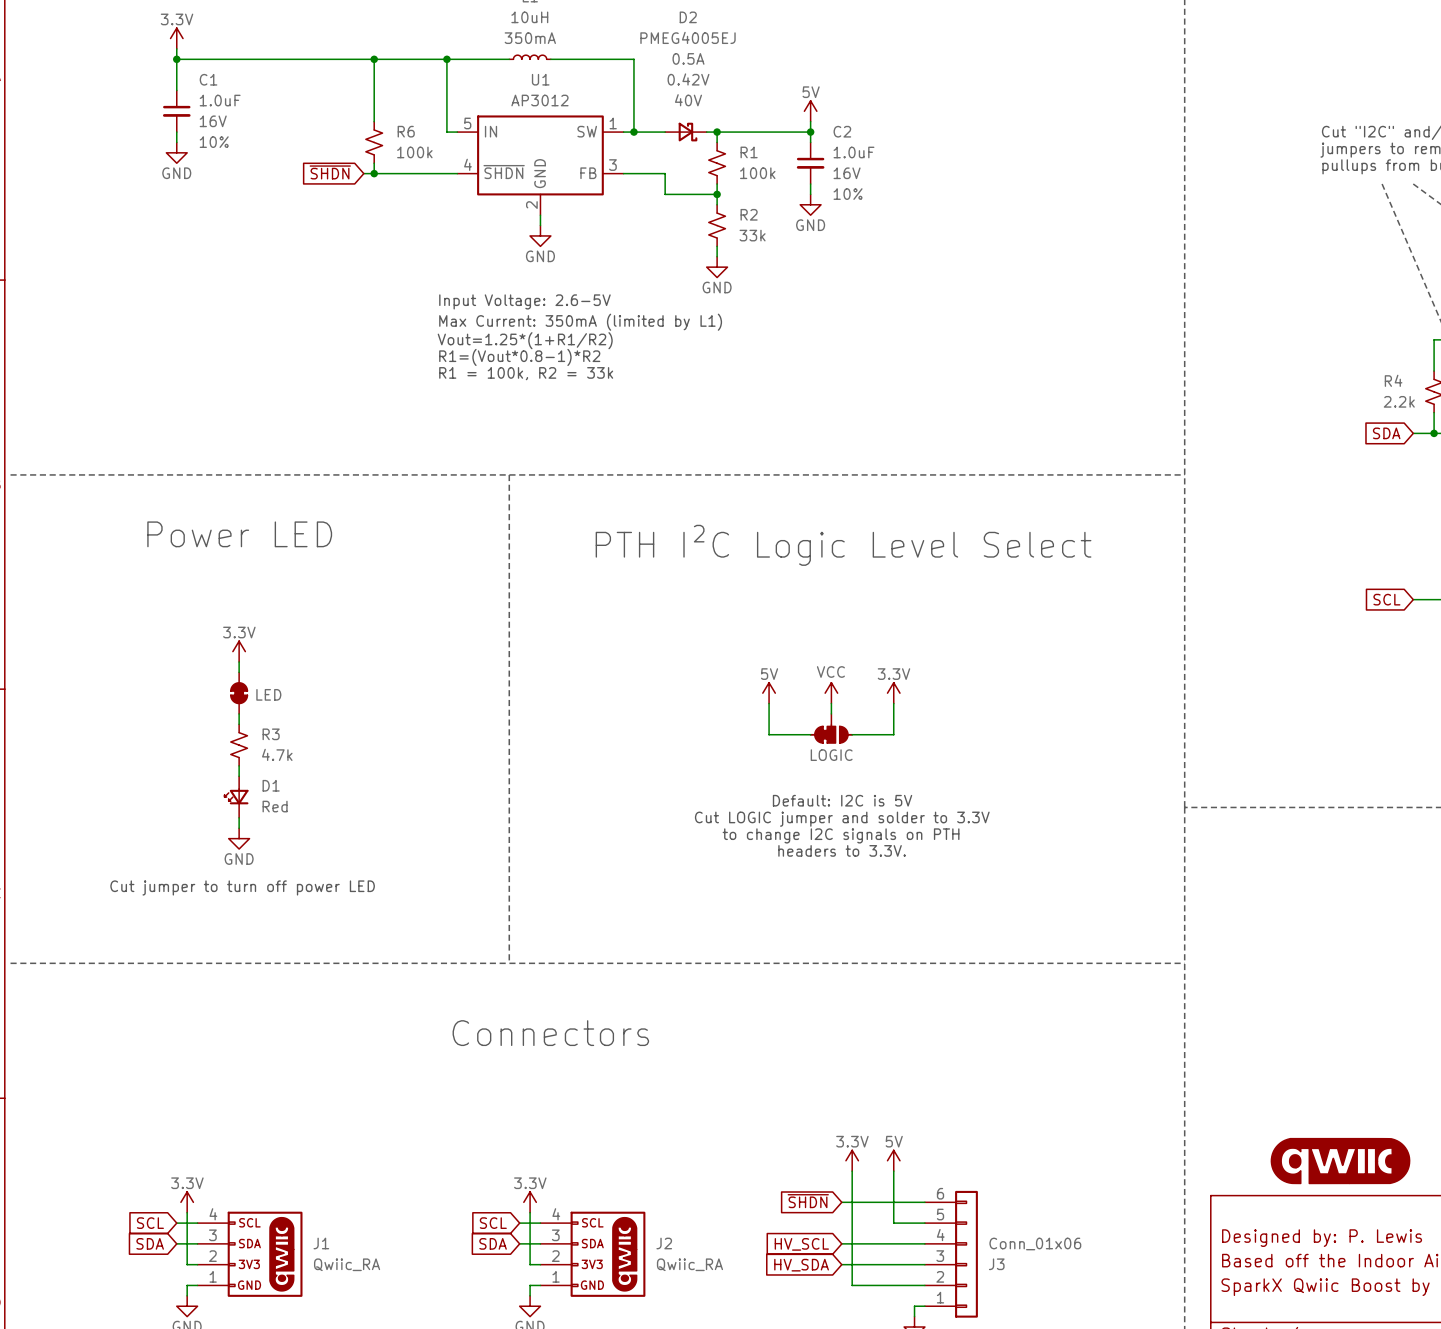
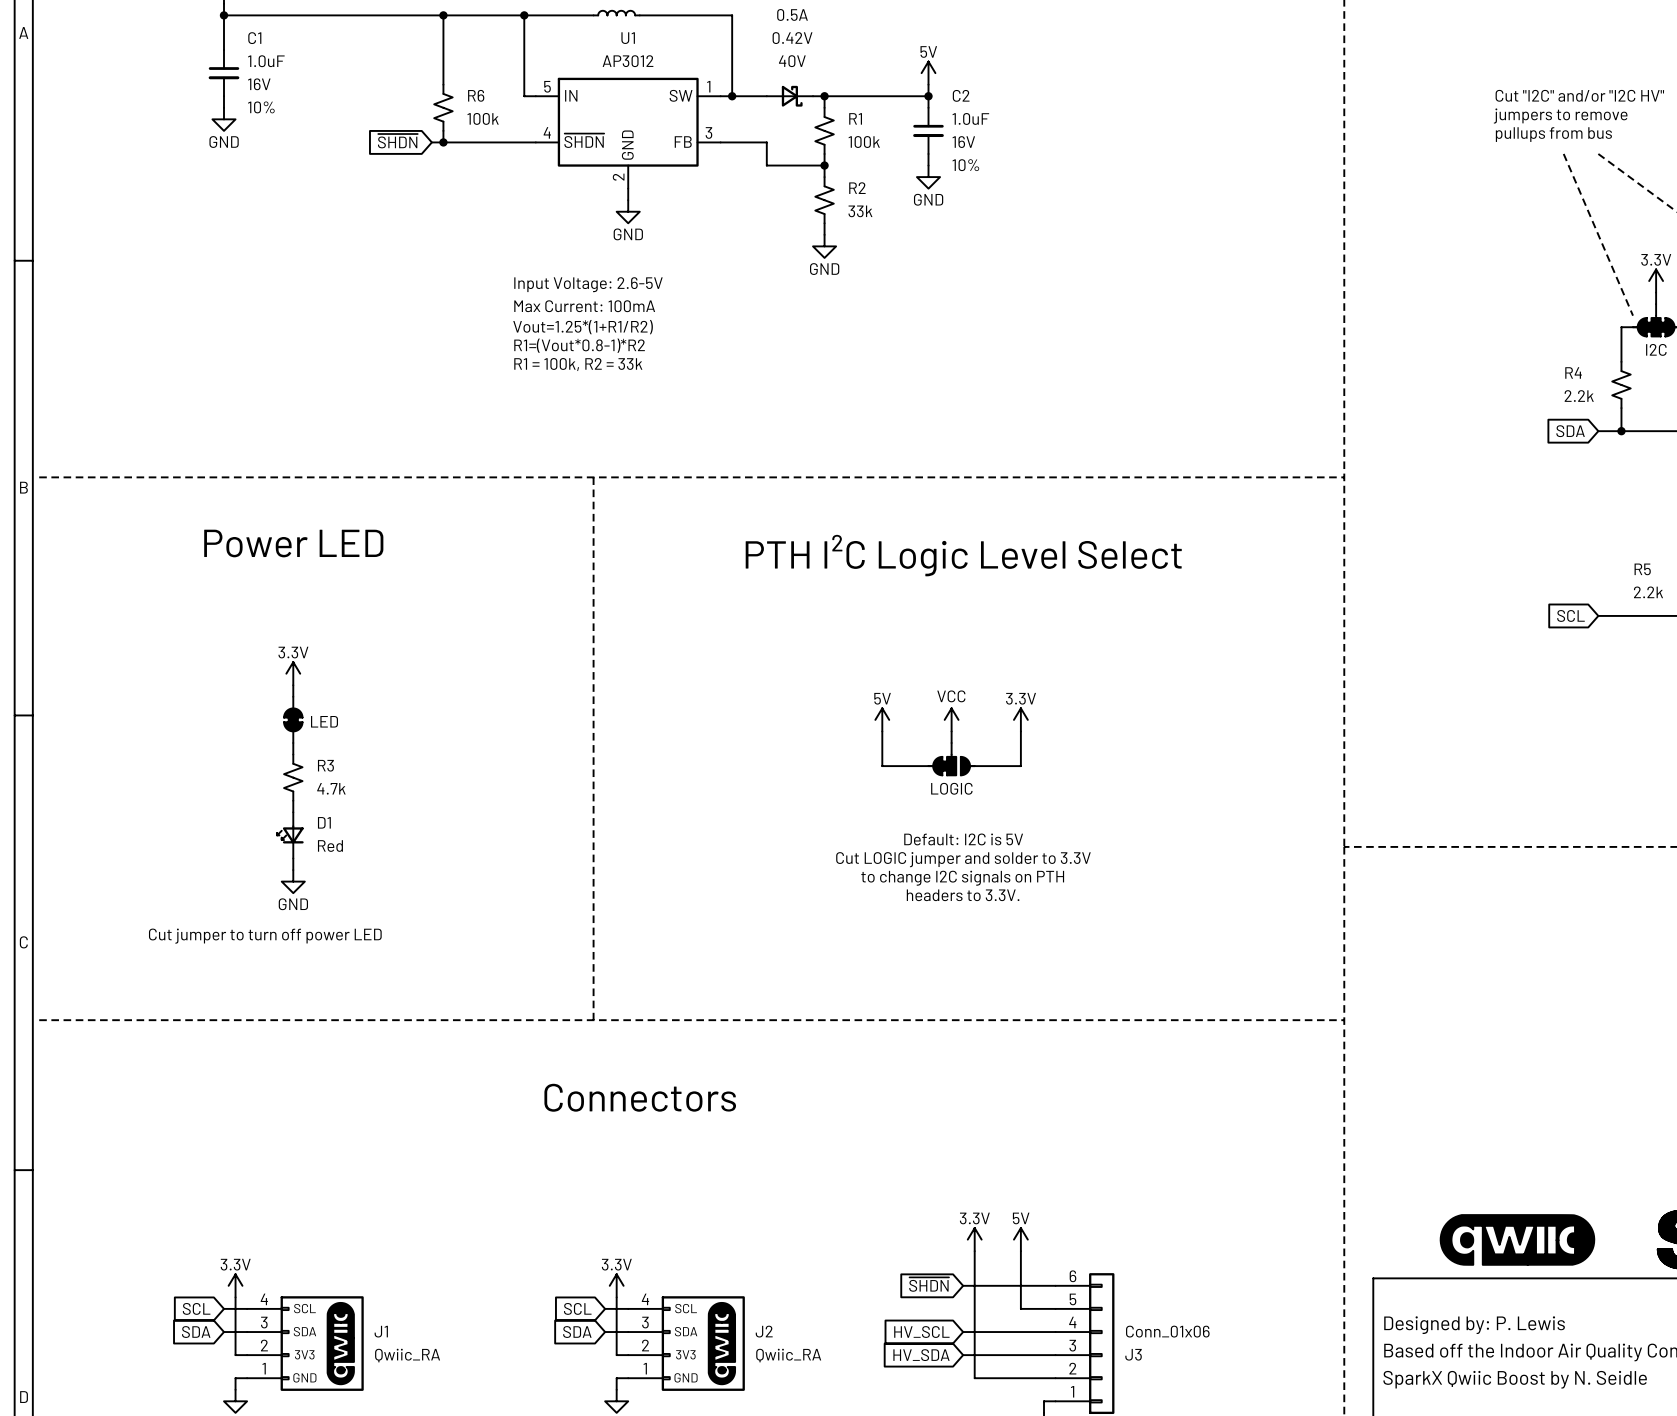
text: Max Current: 350mA (limited by L1) (580, 322) -> Max Current: 100mA (584, 306)

